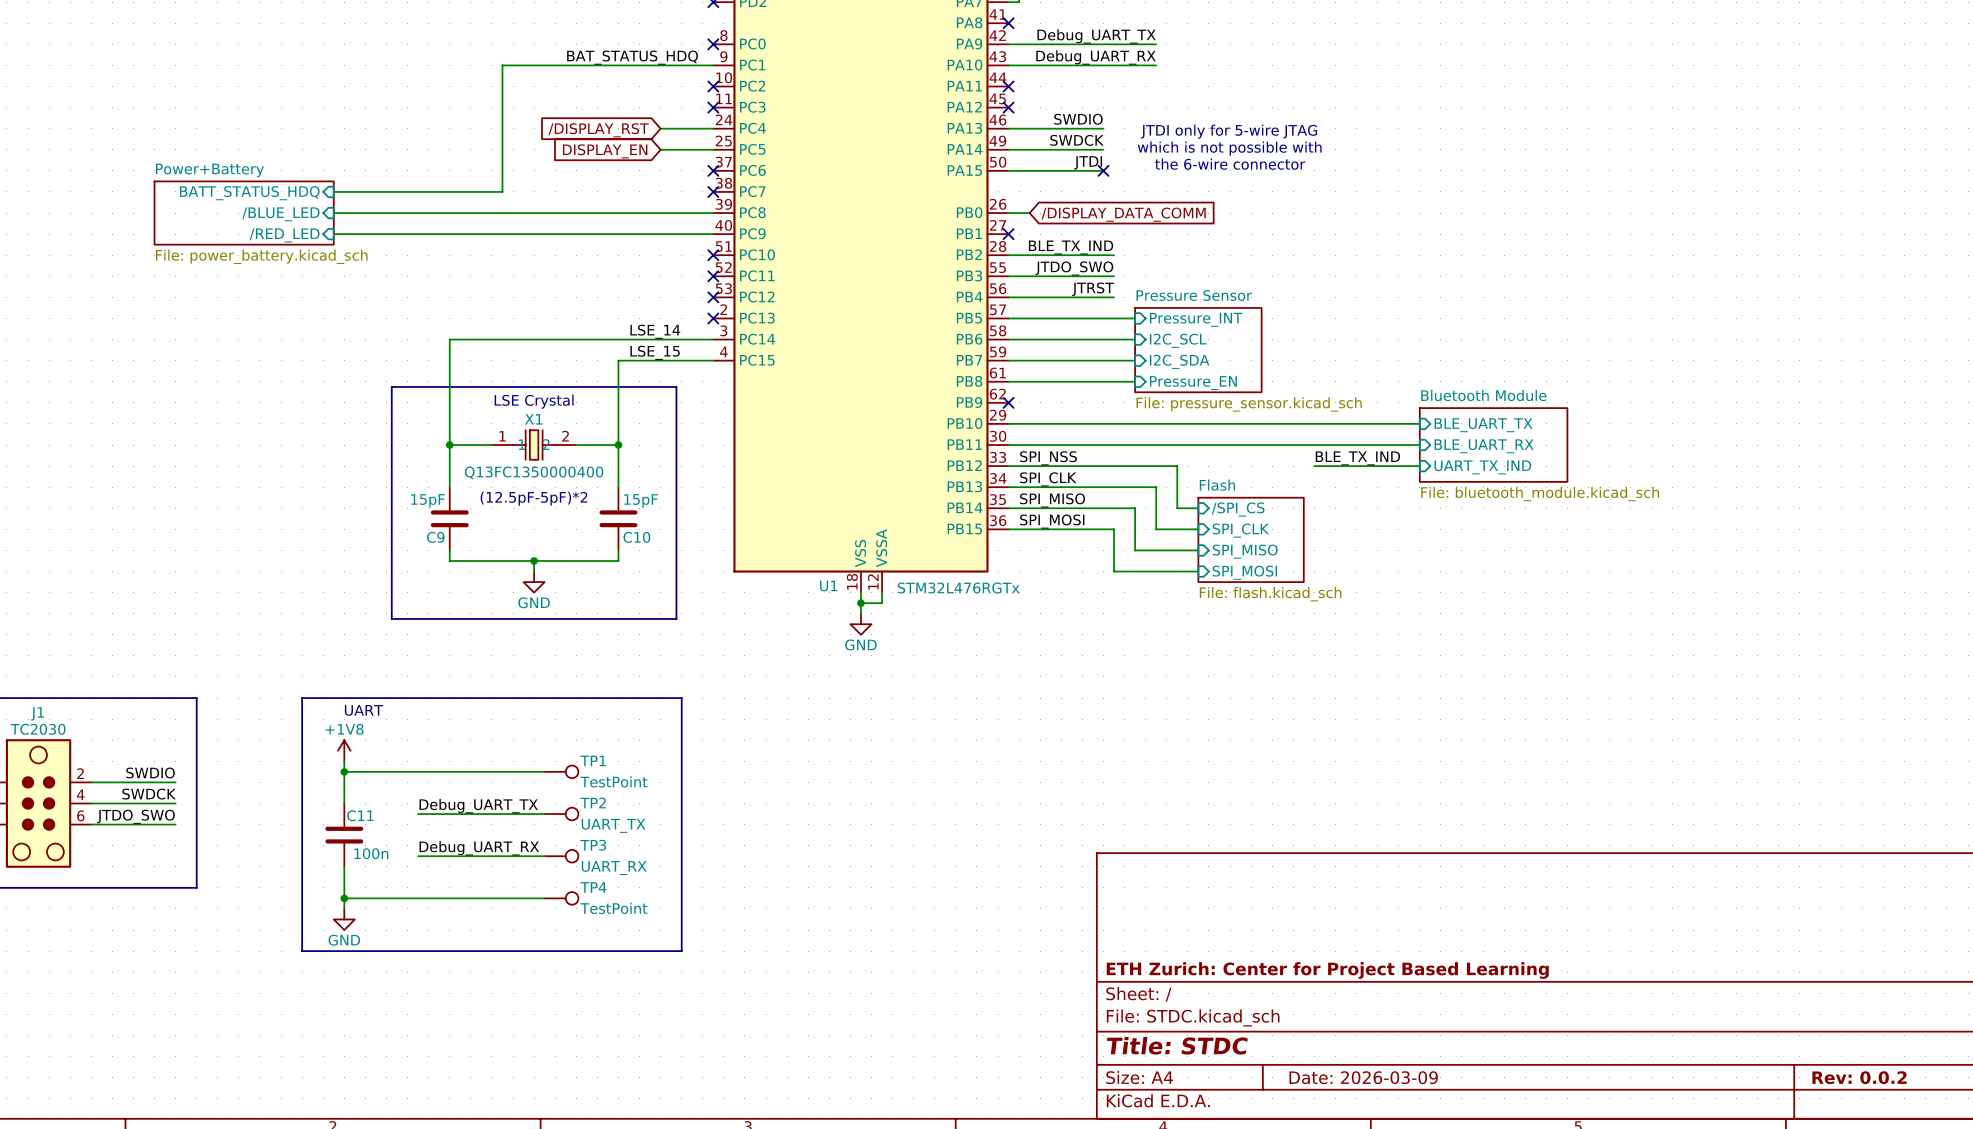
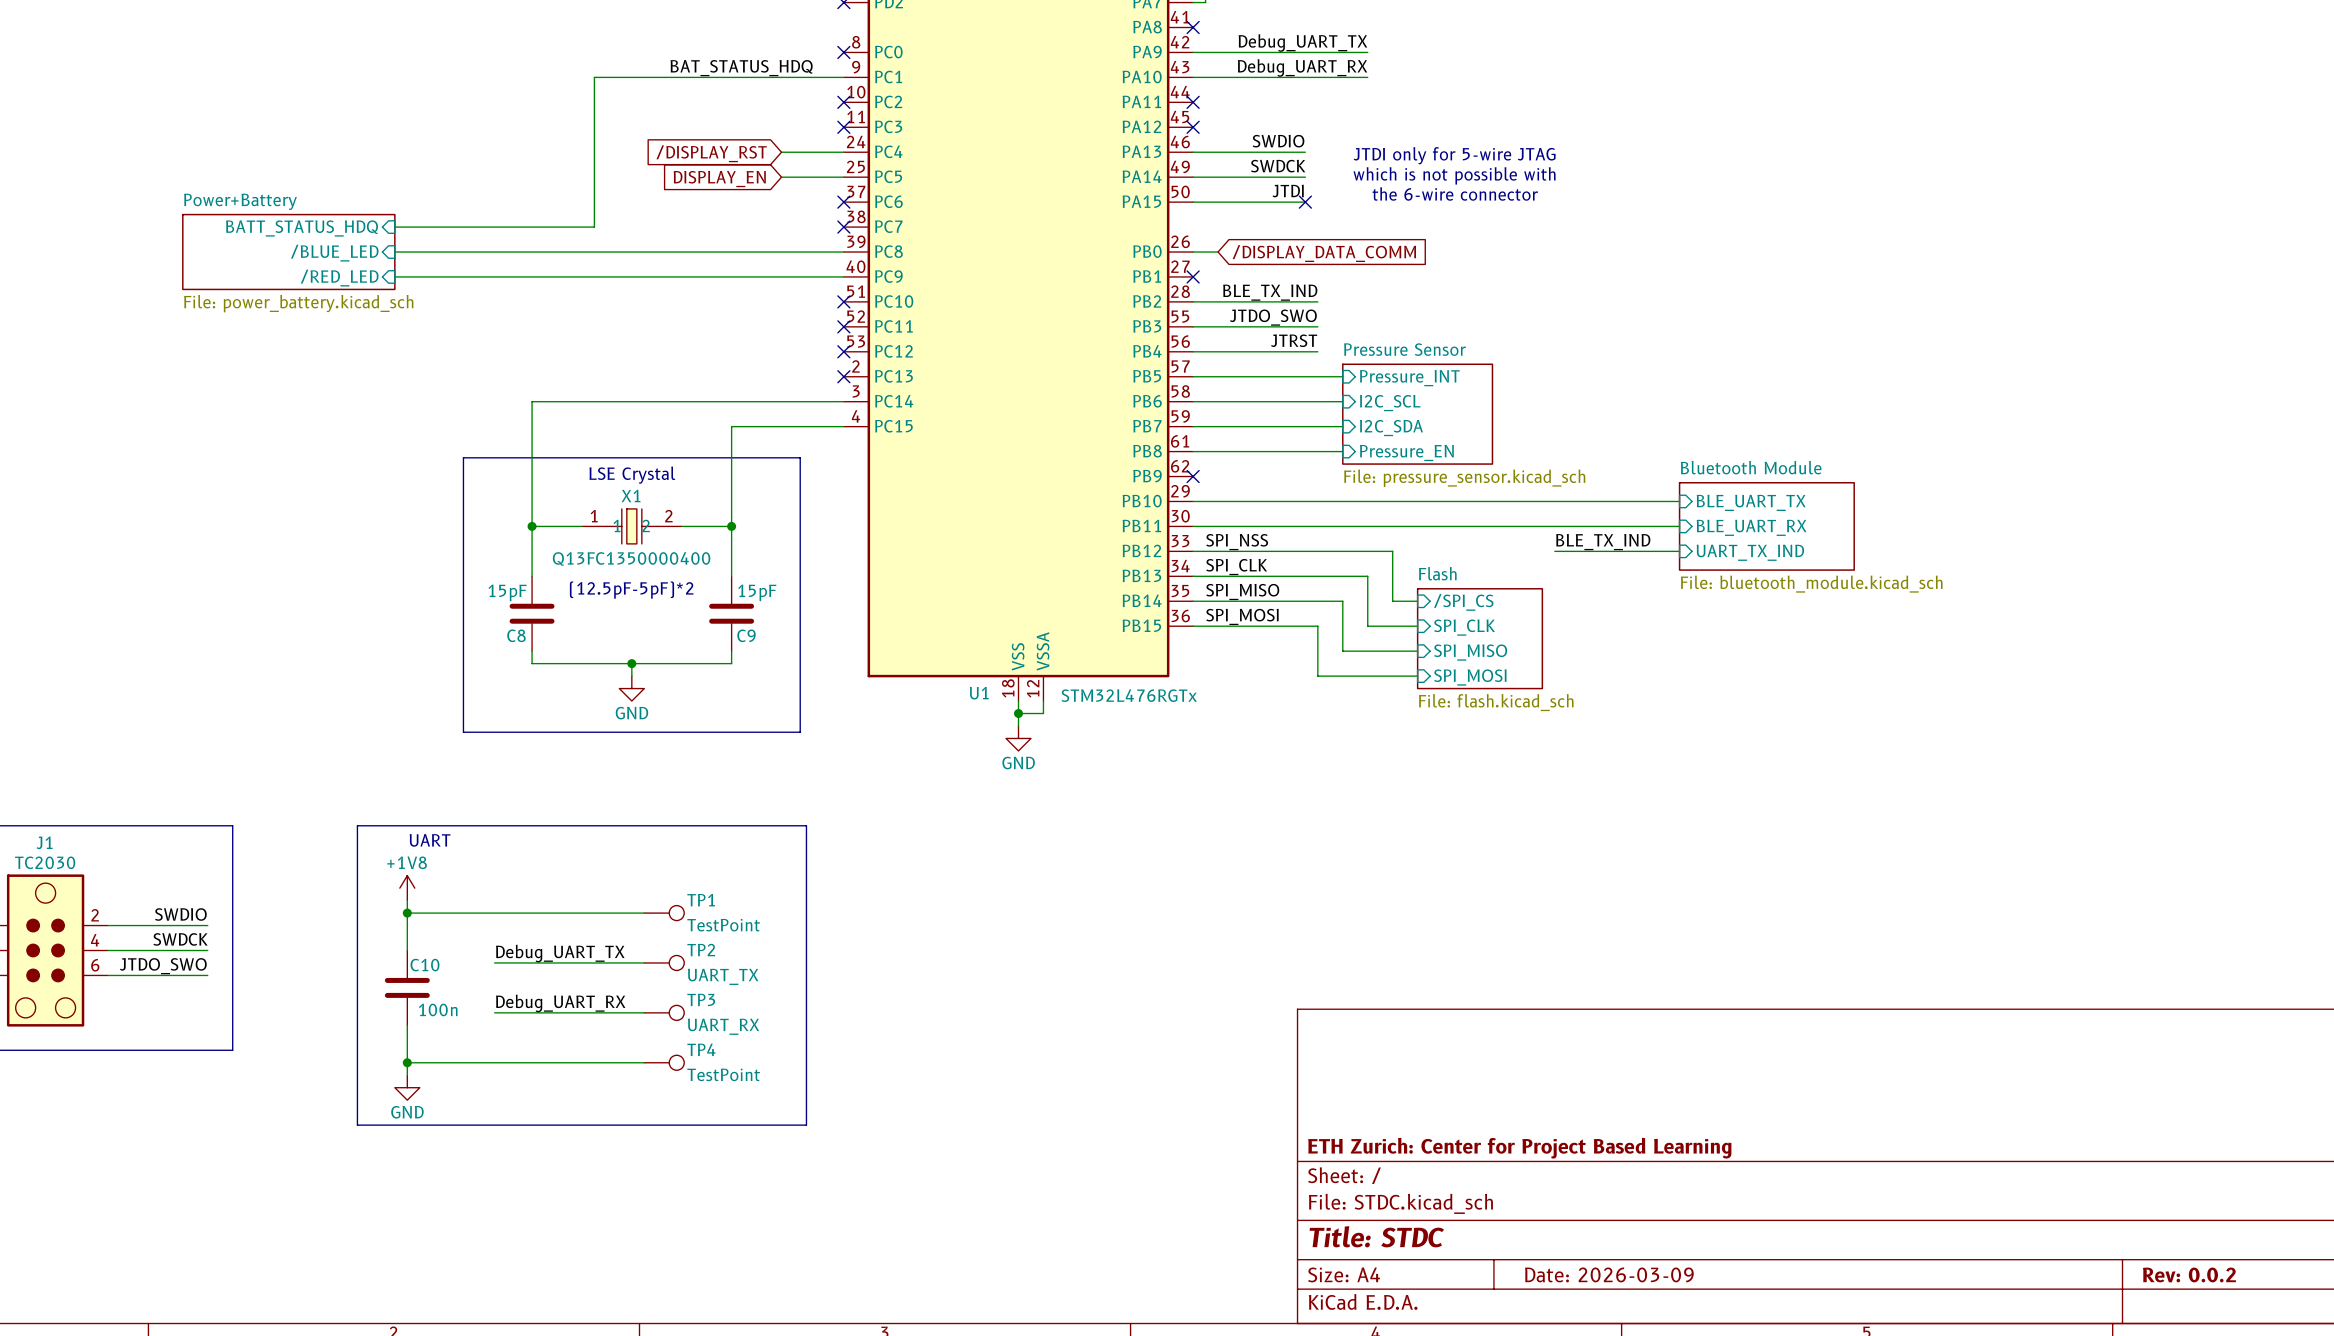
label: LSE_14 (655, 331) -> none
label: LSE_15 (655, 352) -> none
C9 name: C9 (435, 537) -> C8 (516, 635)
C10 name: C10 (636, 537) -> C9 (746, 635)
C11 name: C11 (360, 815) -> C10 (424, 965)

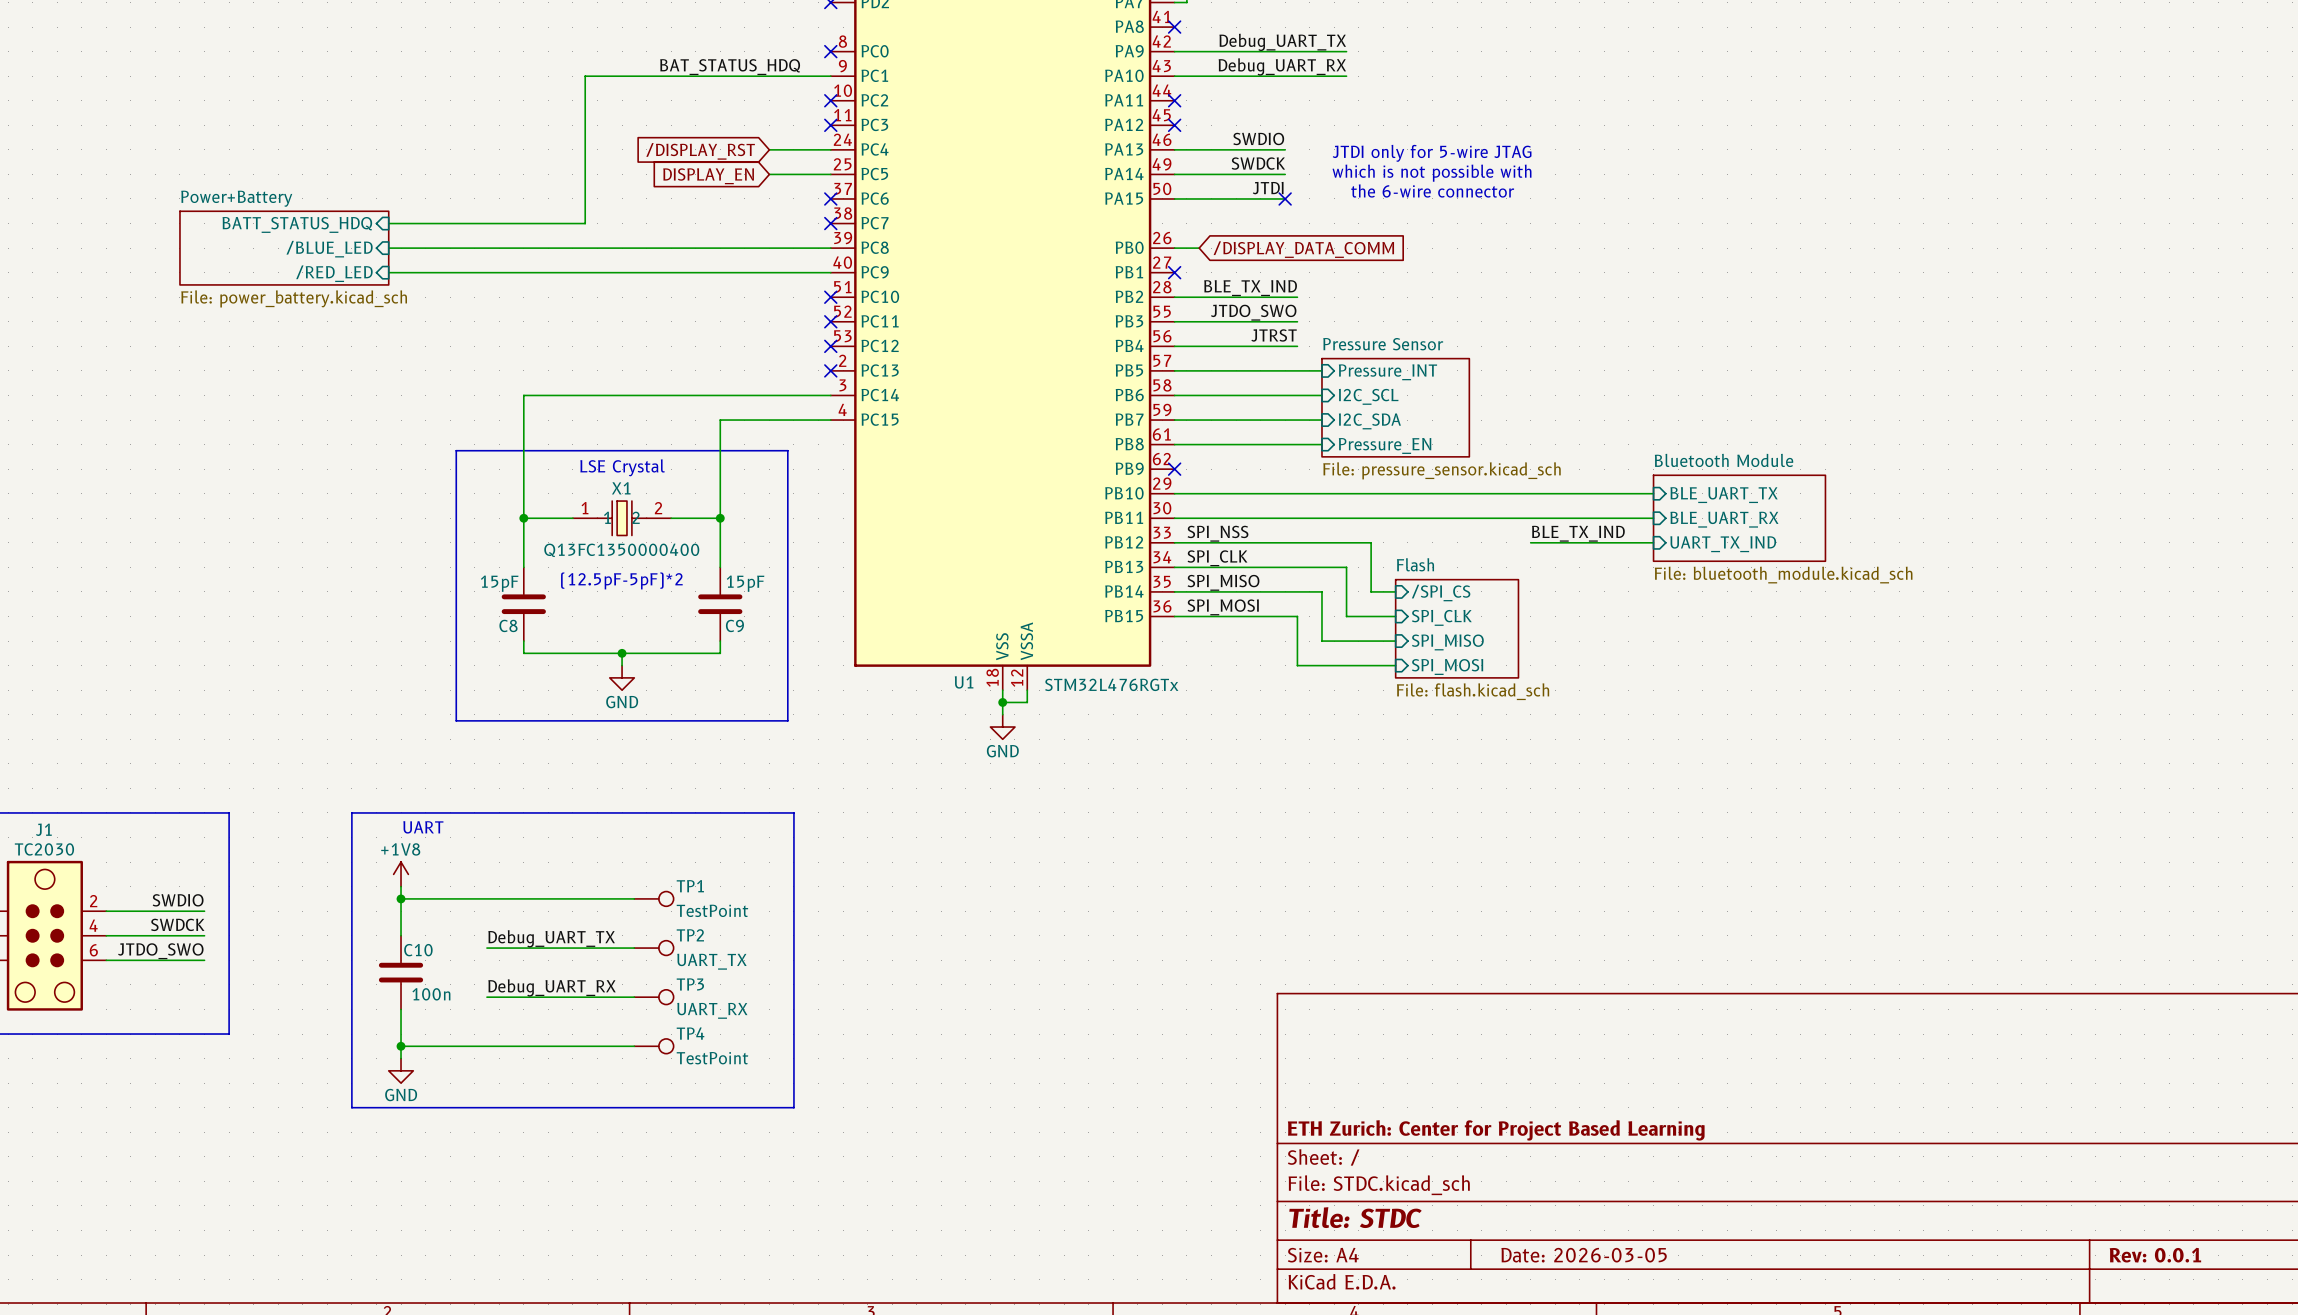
title block: Date: 2026-03-09 (1609, 1274) -> Date: 2026-03-05 (1584, 1255)
title block: Rev: 0.0.2 (2189, 1275) -> Rev: 0.0.1 (2155, 1255)

